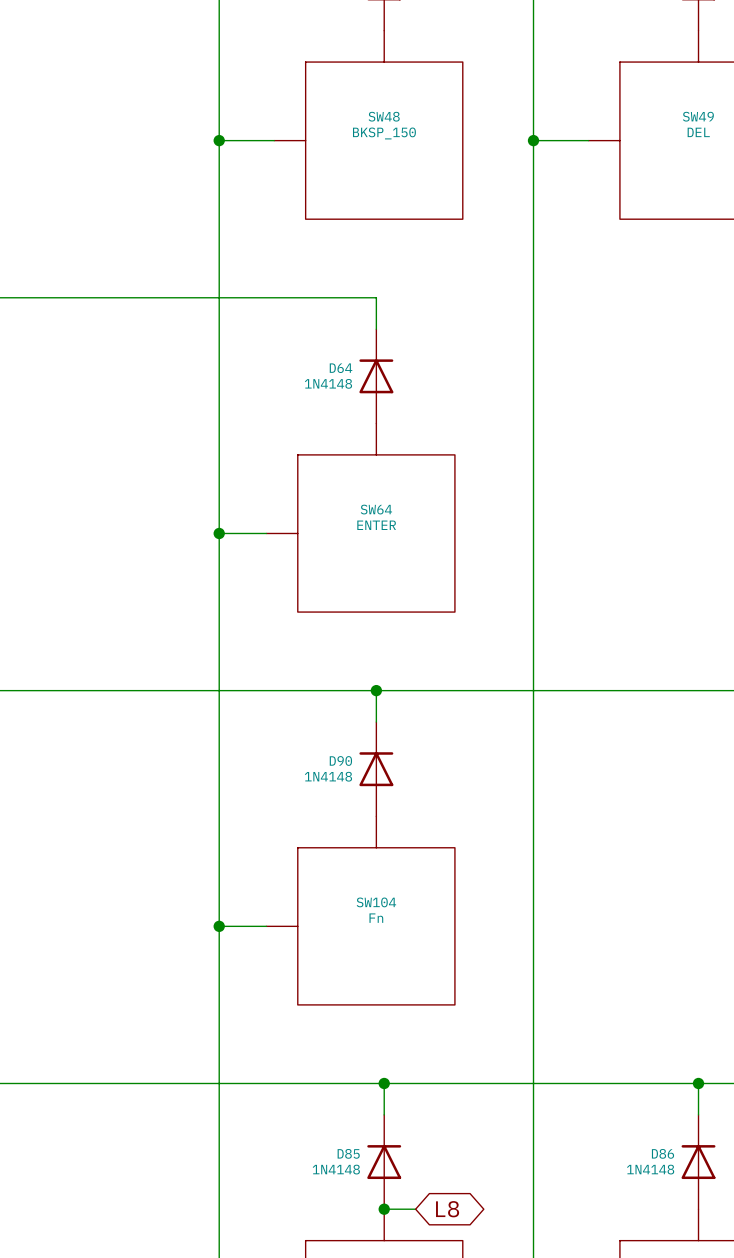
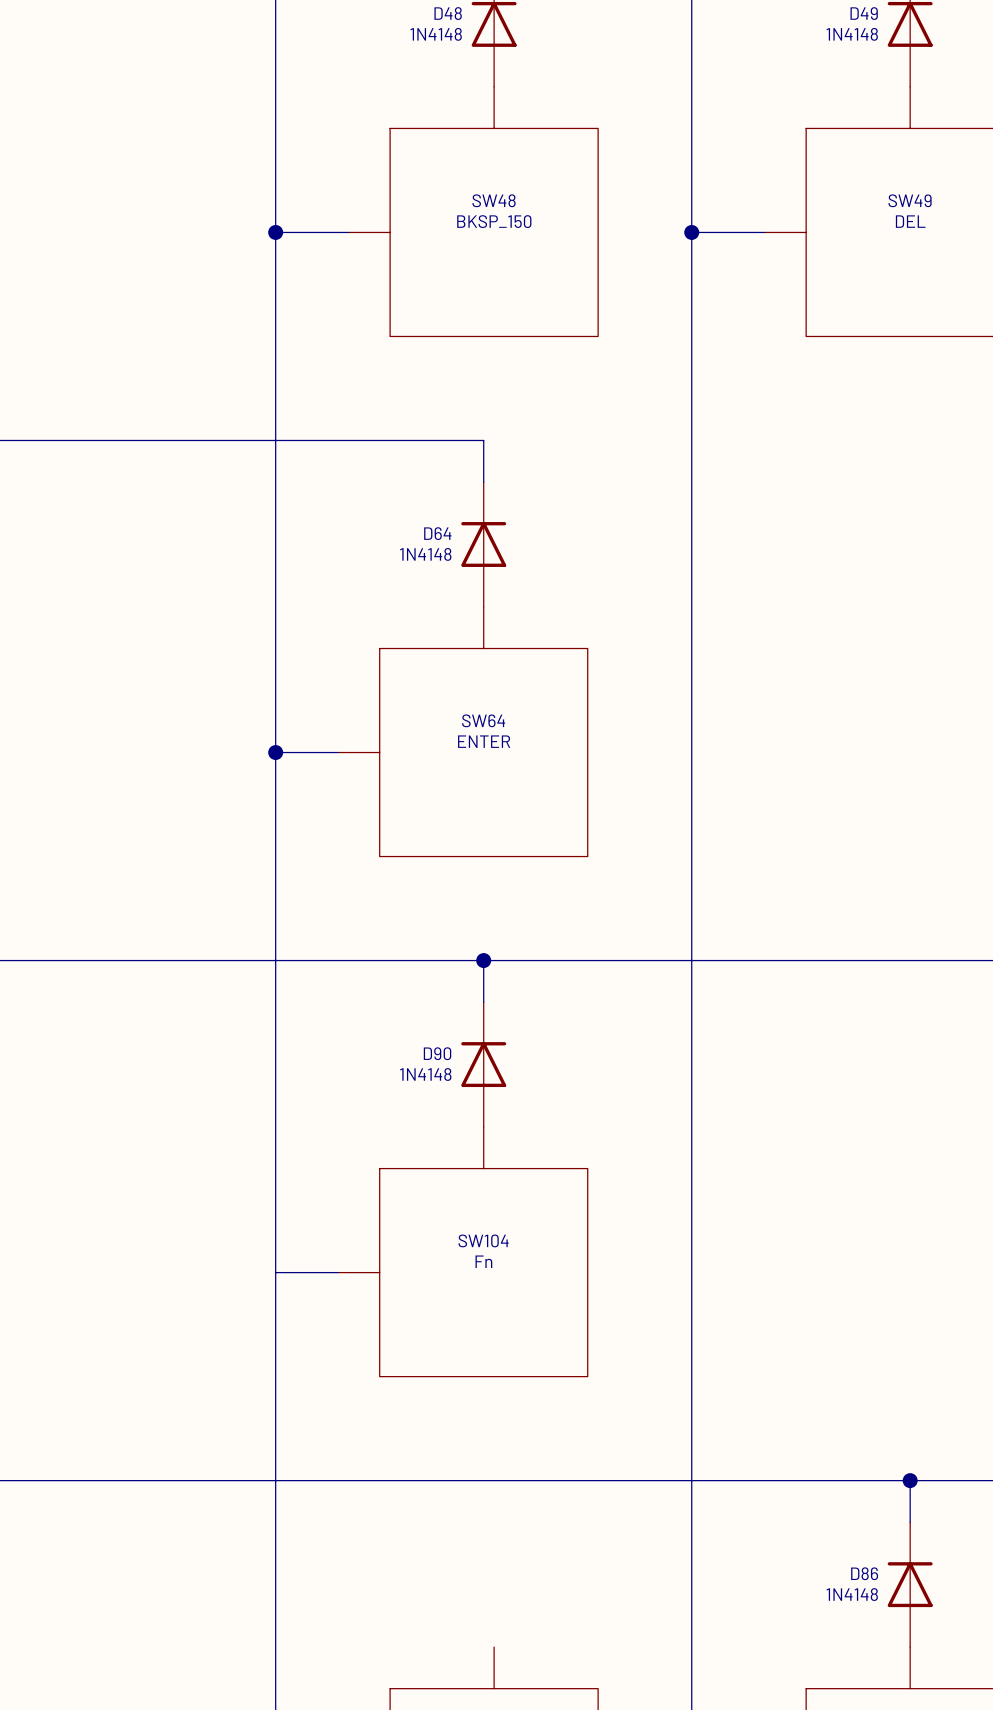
junction: (219, 926) -> none
wire: (384, 1083) (384, 1114) -> none
junction: (384, 1083) -> none
D85: 1N4148 (384, 1162) -> none
wire: (384, 1209) (415, 1209) -> none
junction: (384, 1209) -> none
global label: L8 (447, 1209) -> none

